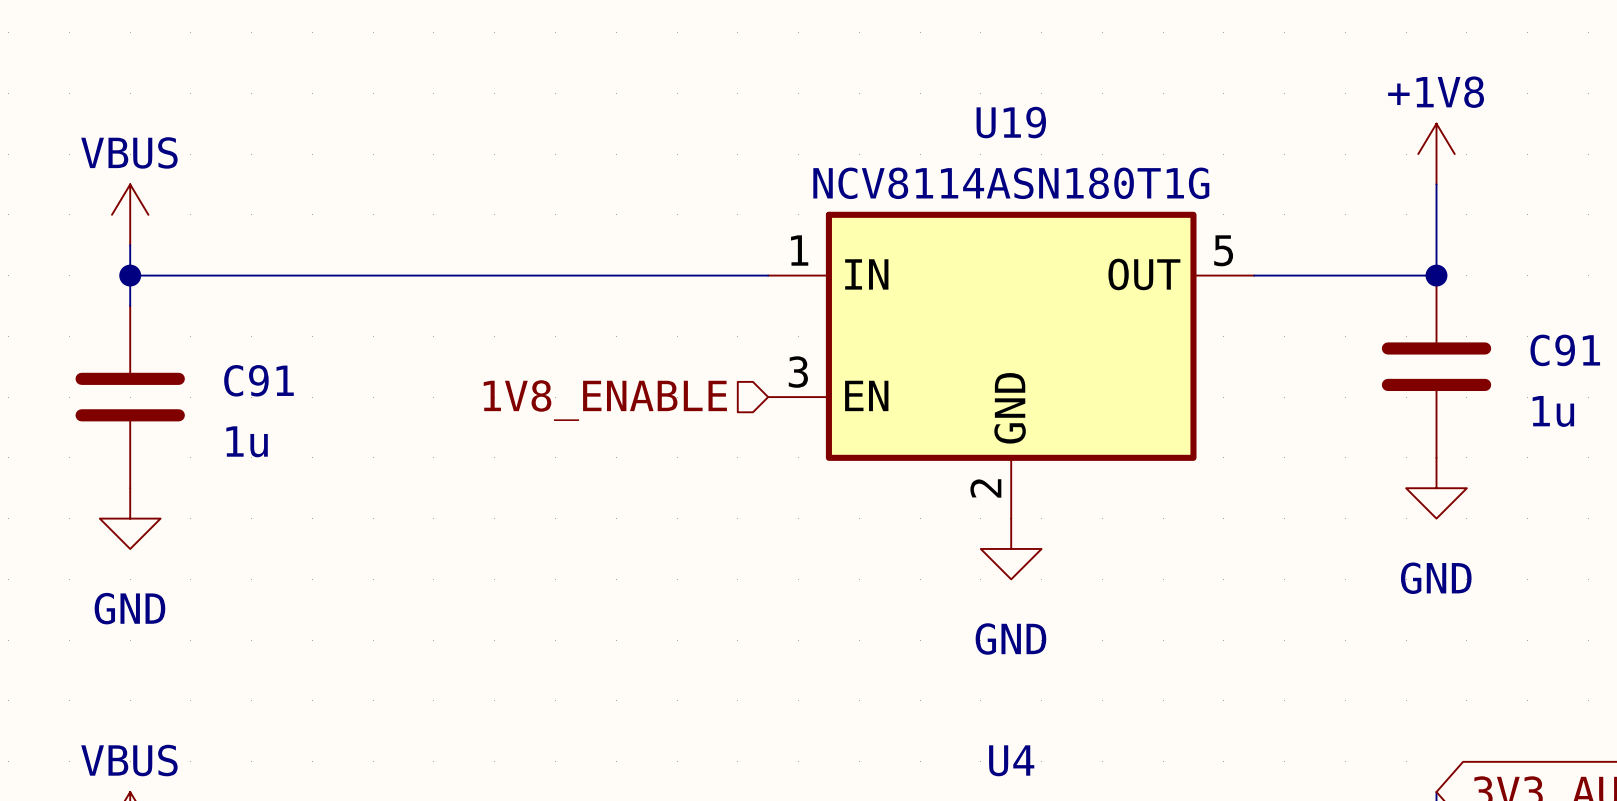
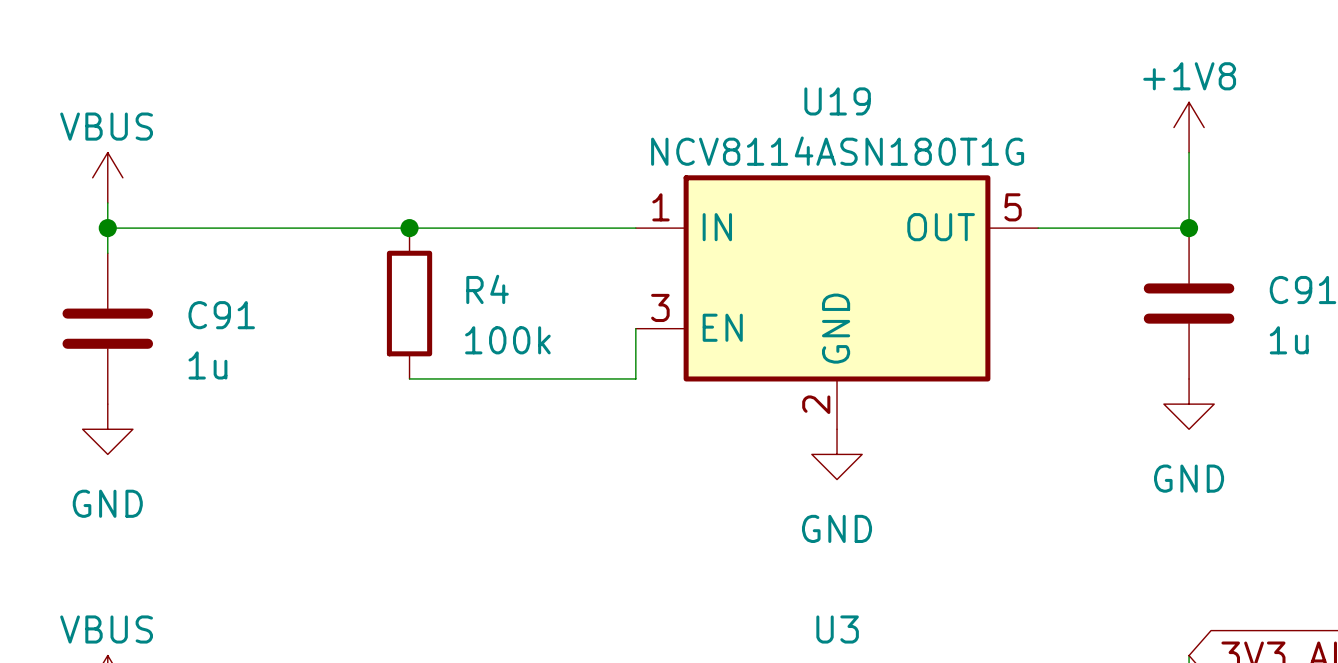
junction: none -> (409, 228)
R4: none -> 100k (409, 303)
wire: none -> (635, 328) (635, 378) (409, 378)
hierarchical label: 1V8_ENABLE (605, 400) -> none
U4 name: U4 (1011, 760) -> U3 (837, 629)

